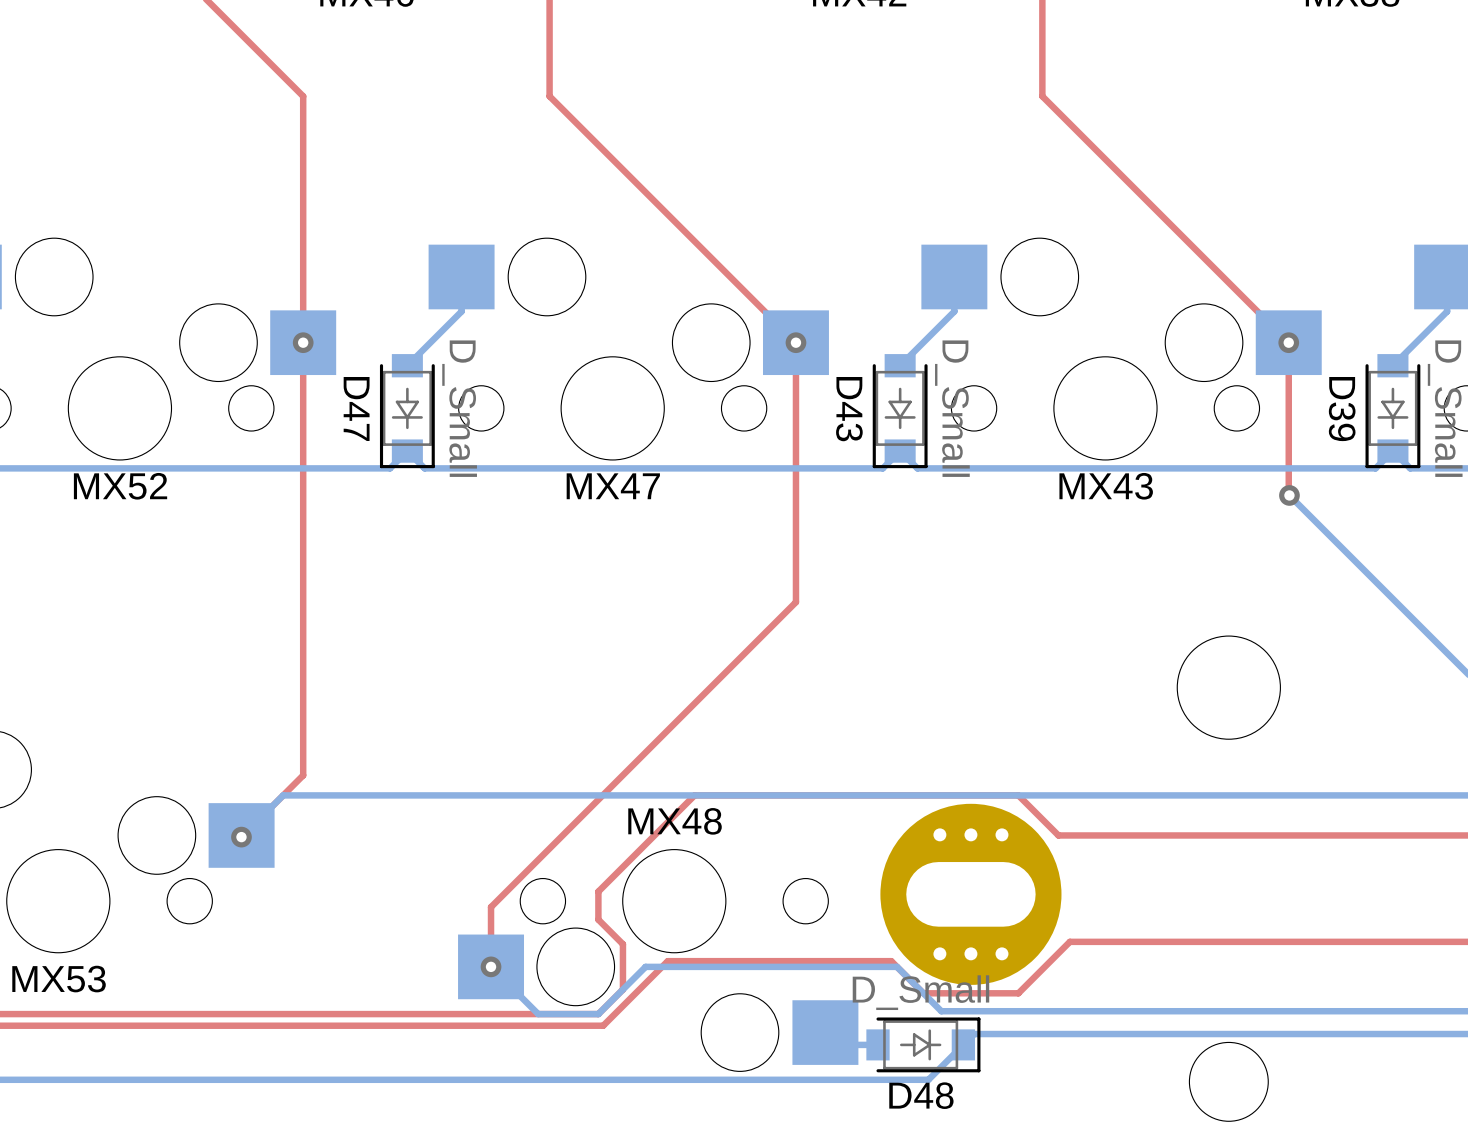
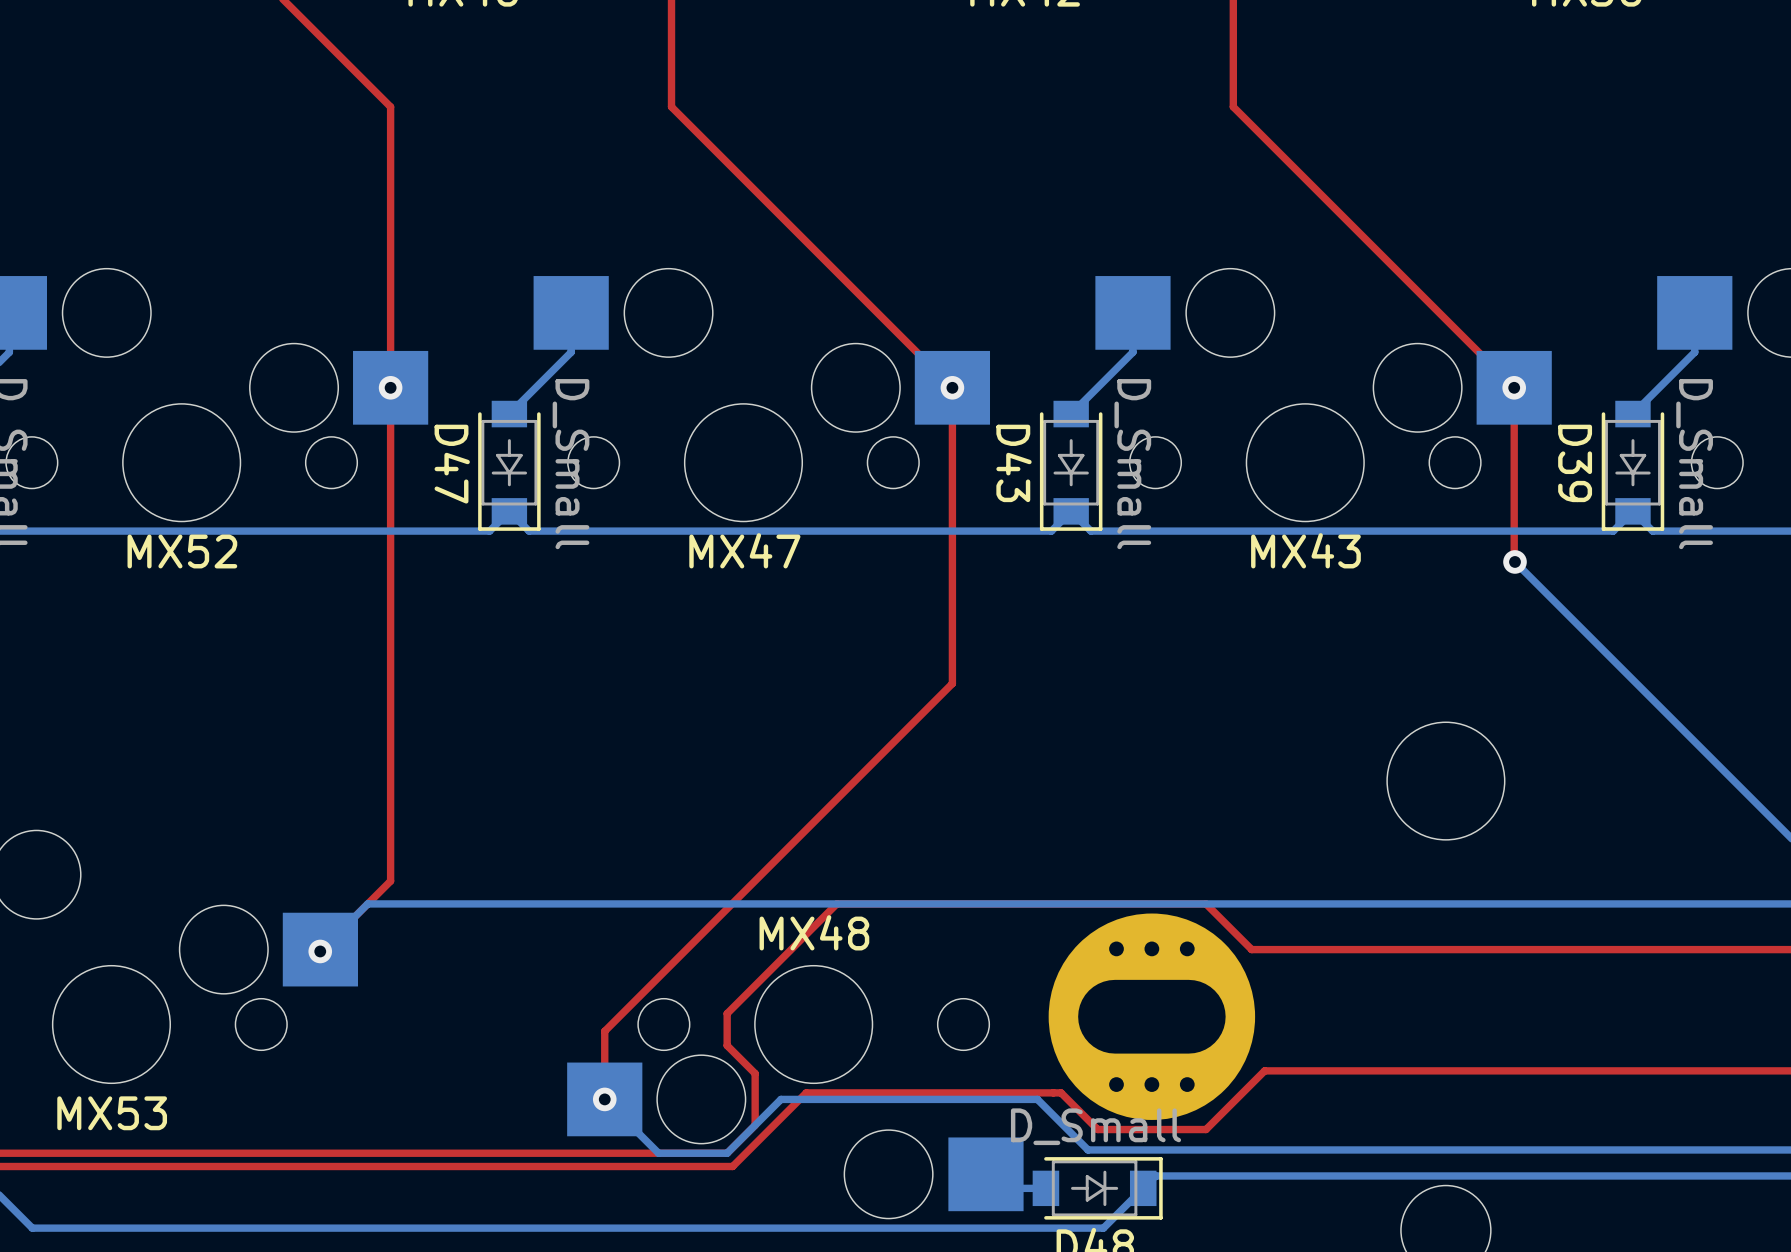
bottom track: (870, 966) (897, 966) (941, 1011) -> (1037, 1099) (1088, 1149) (1118, 1149)

